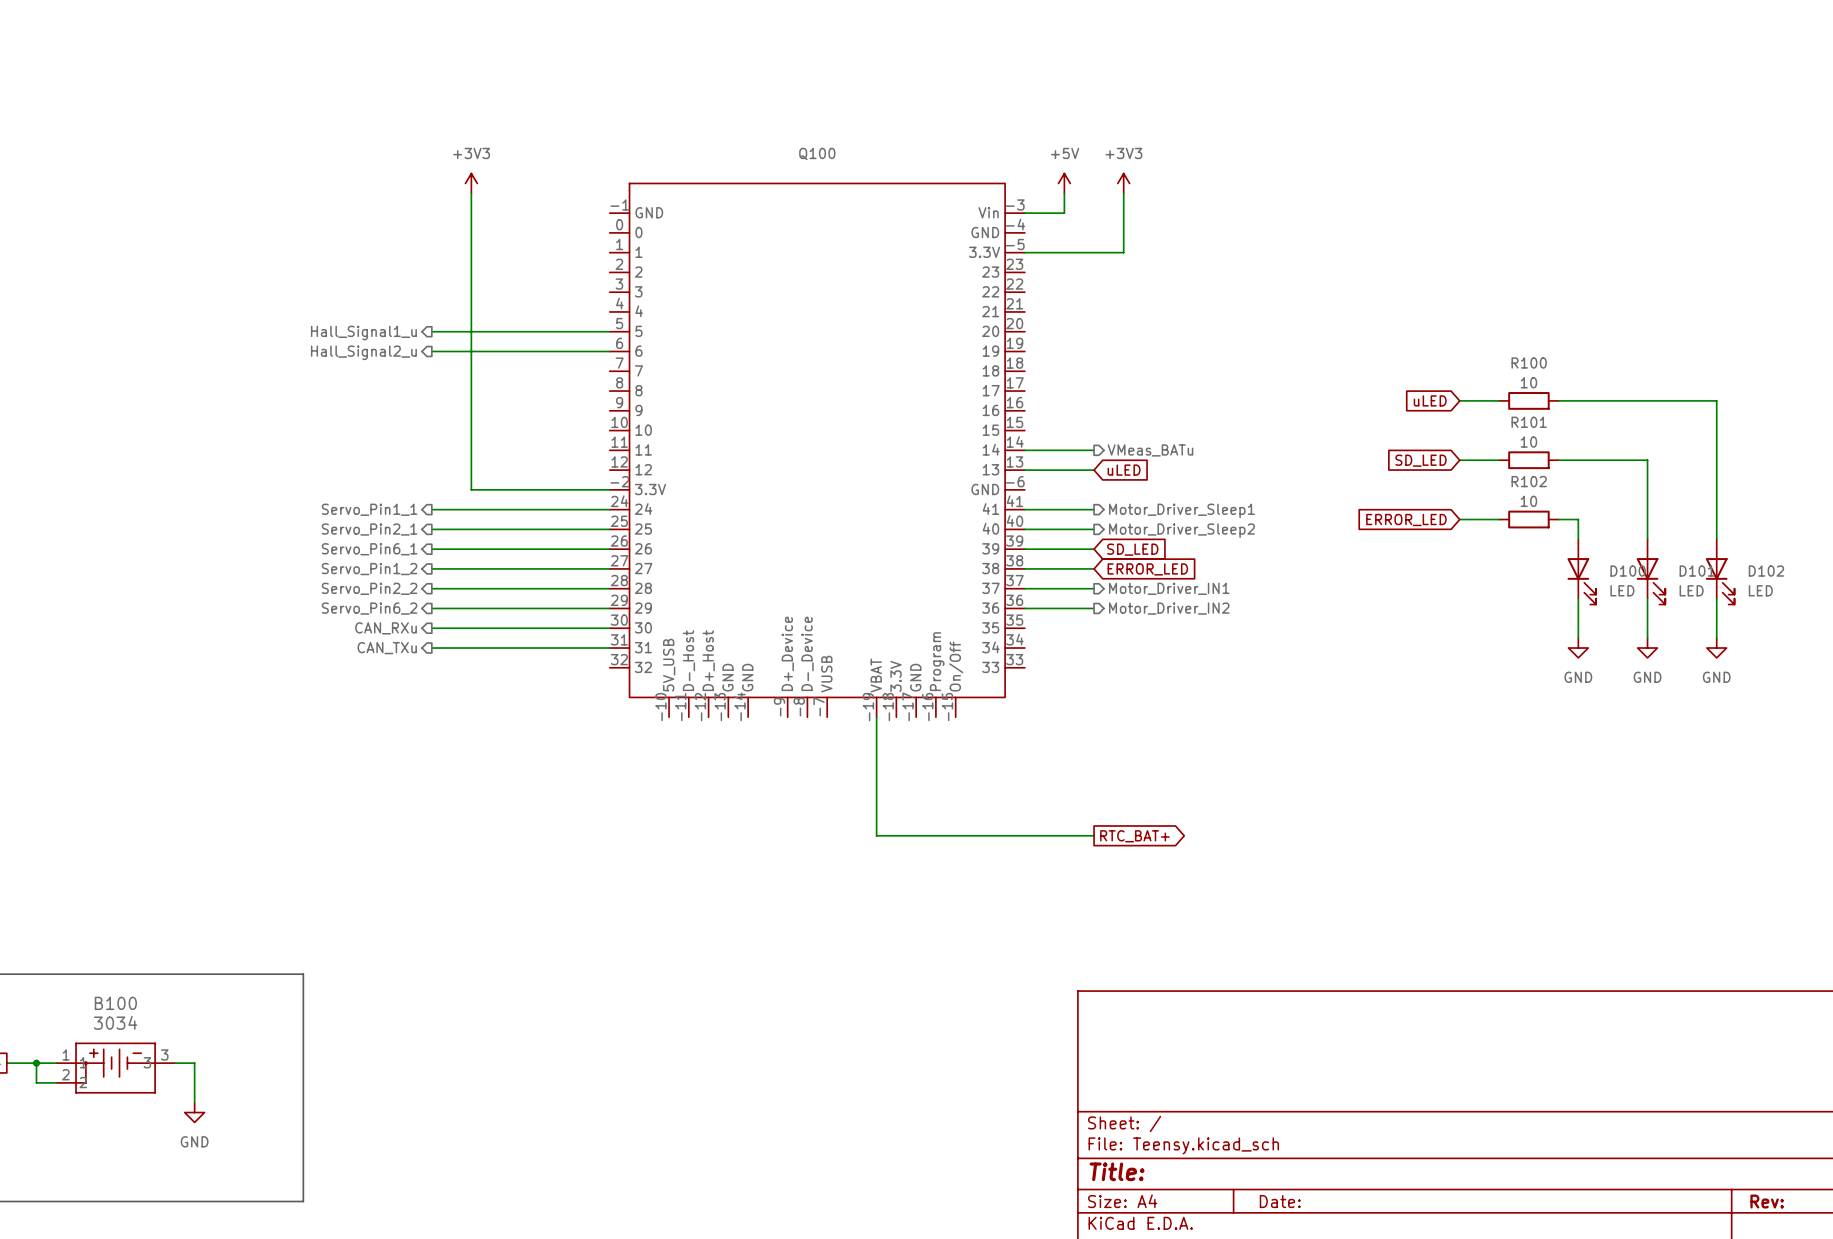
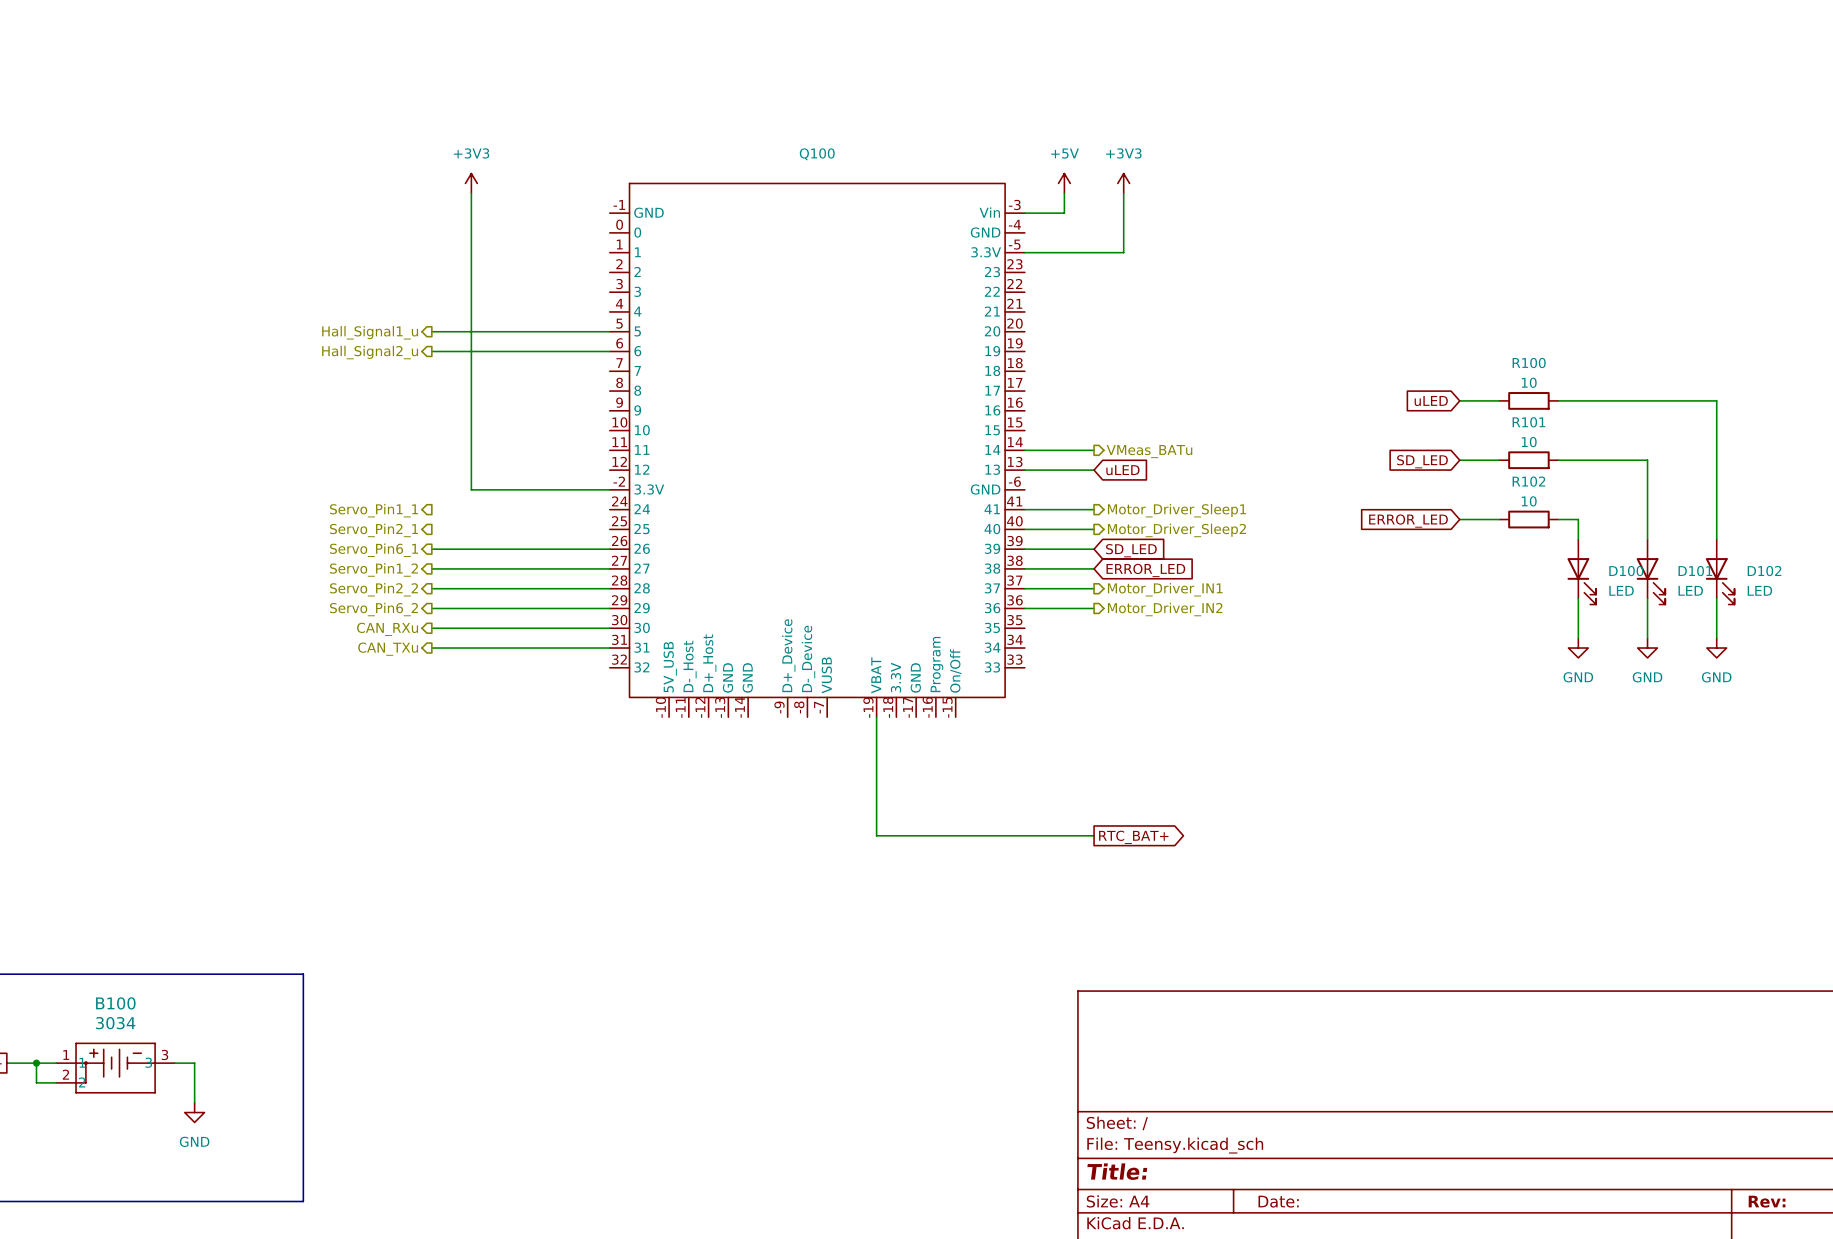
wire: (431, 509) (609, 509) -> none
wire: (431, 529) (609, 529) -> none

